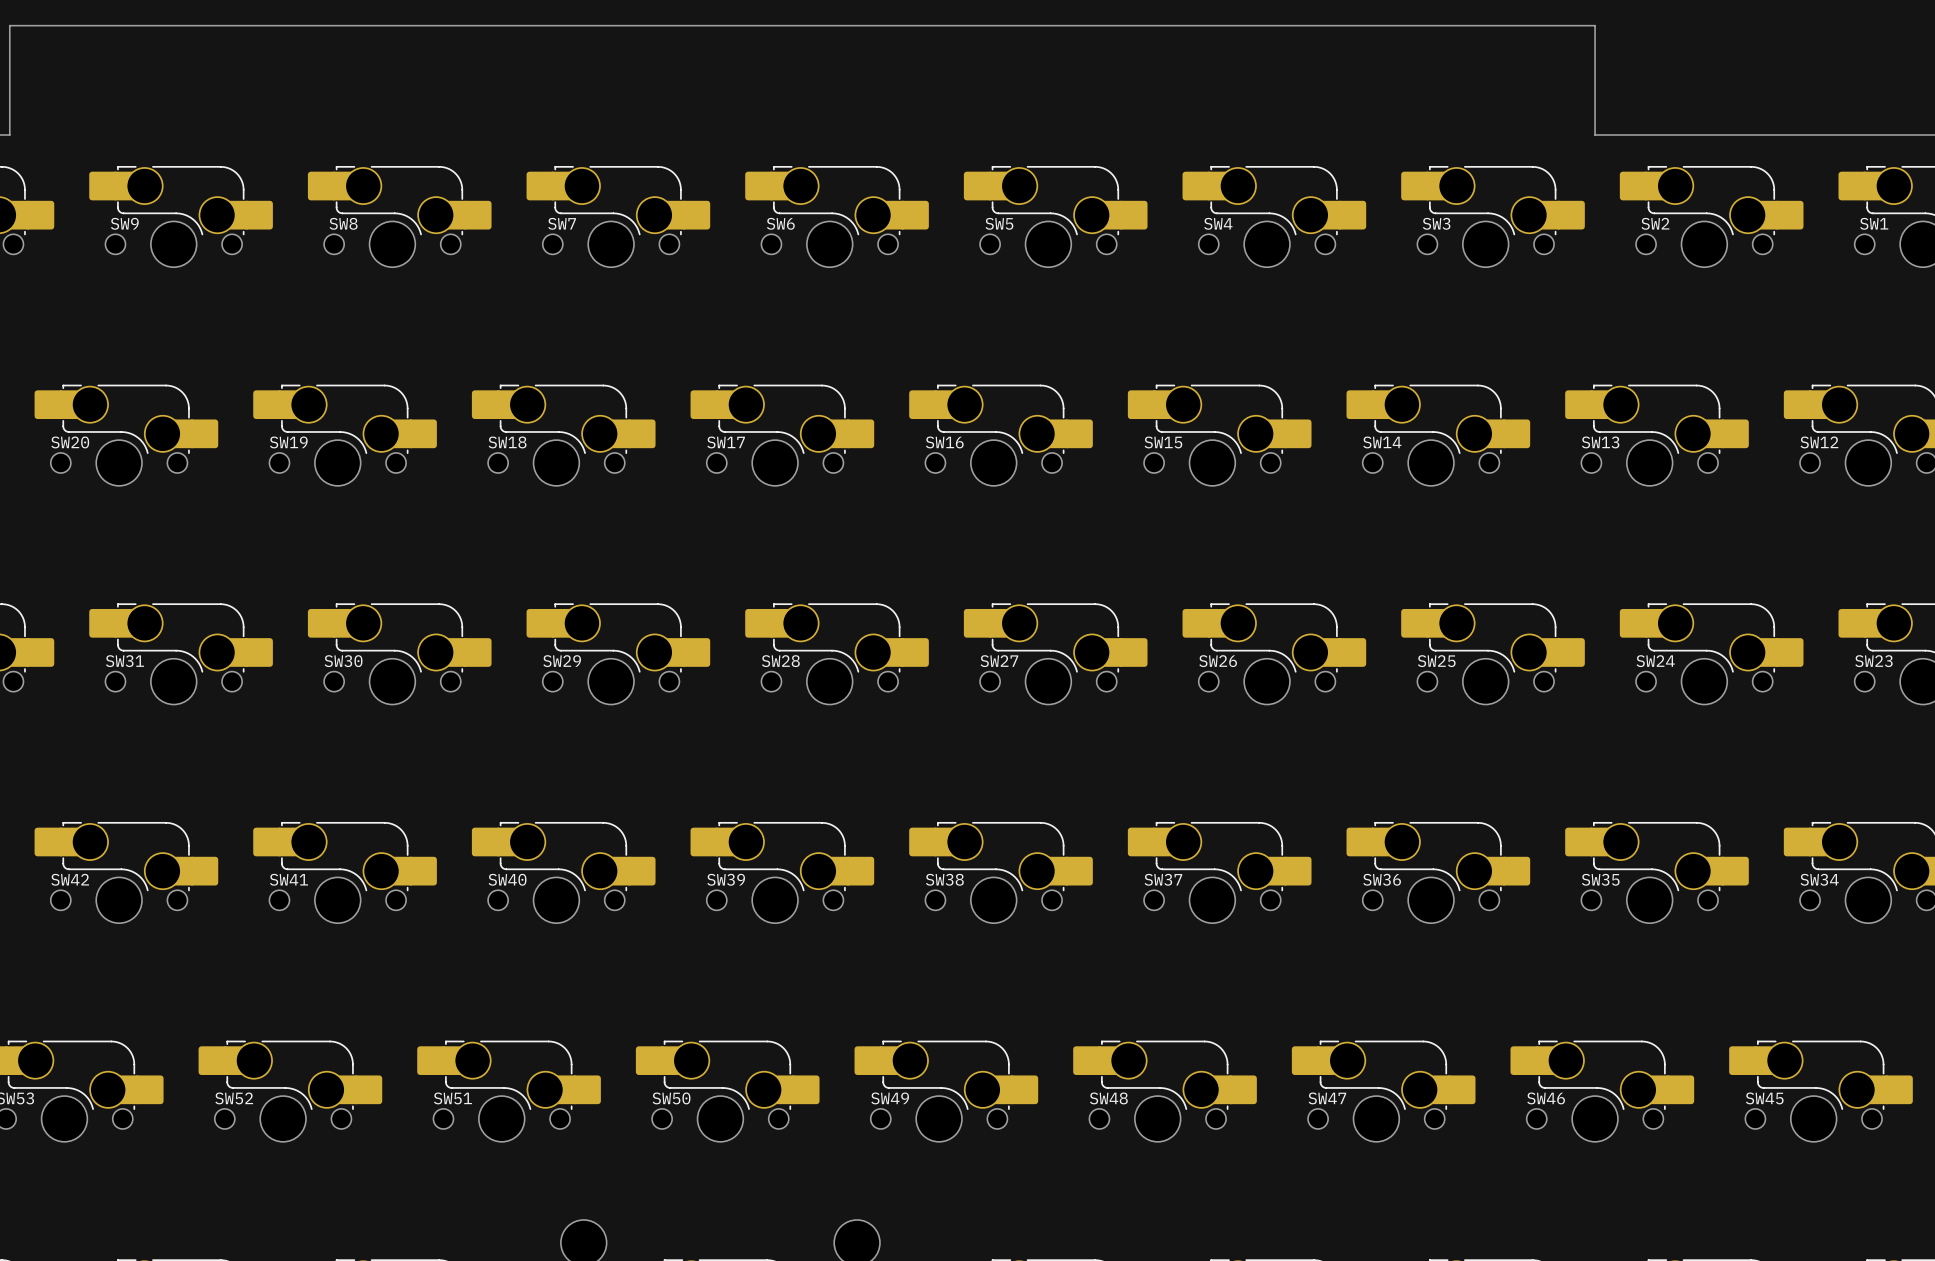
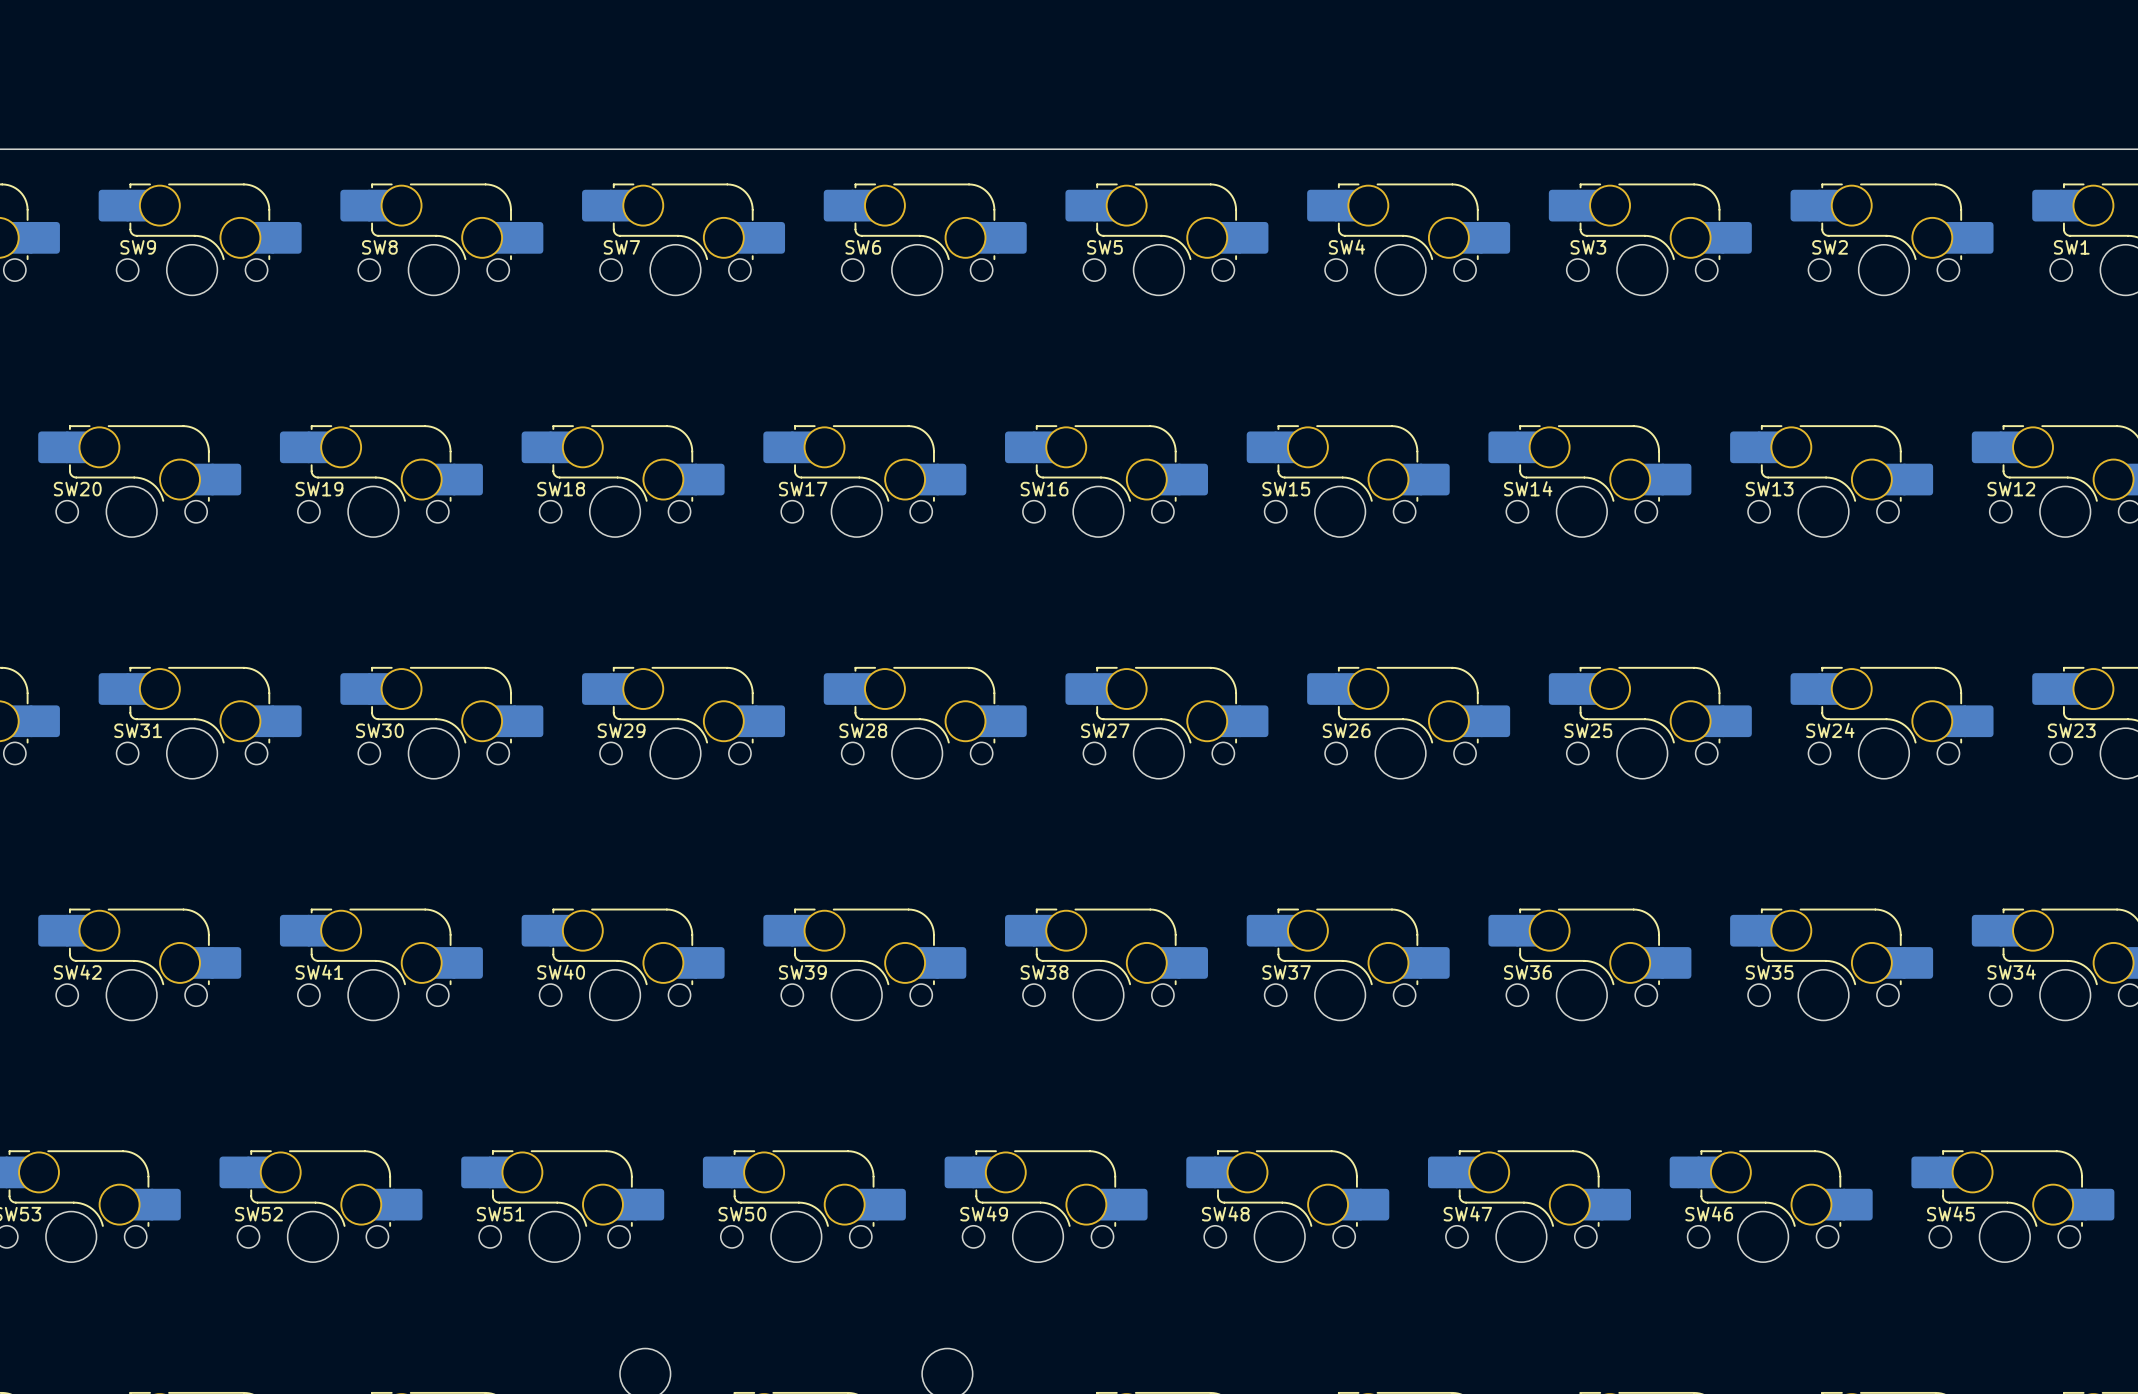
board edge: (1595, 135) (1595, 25) (9, 25) (9, 135) -> (1763, 149) (10, 149)

